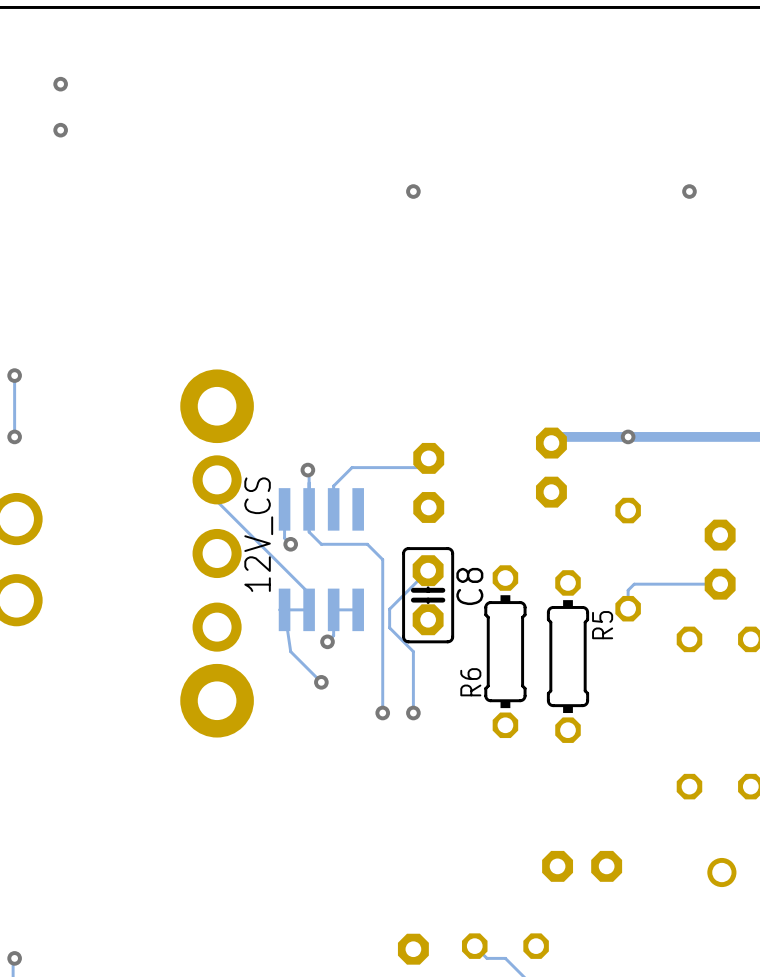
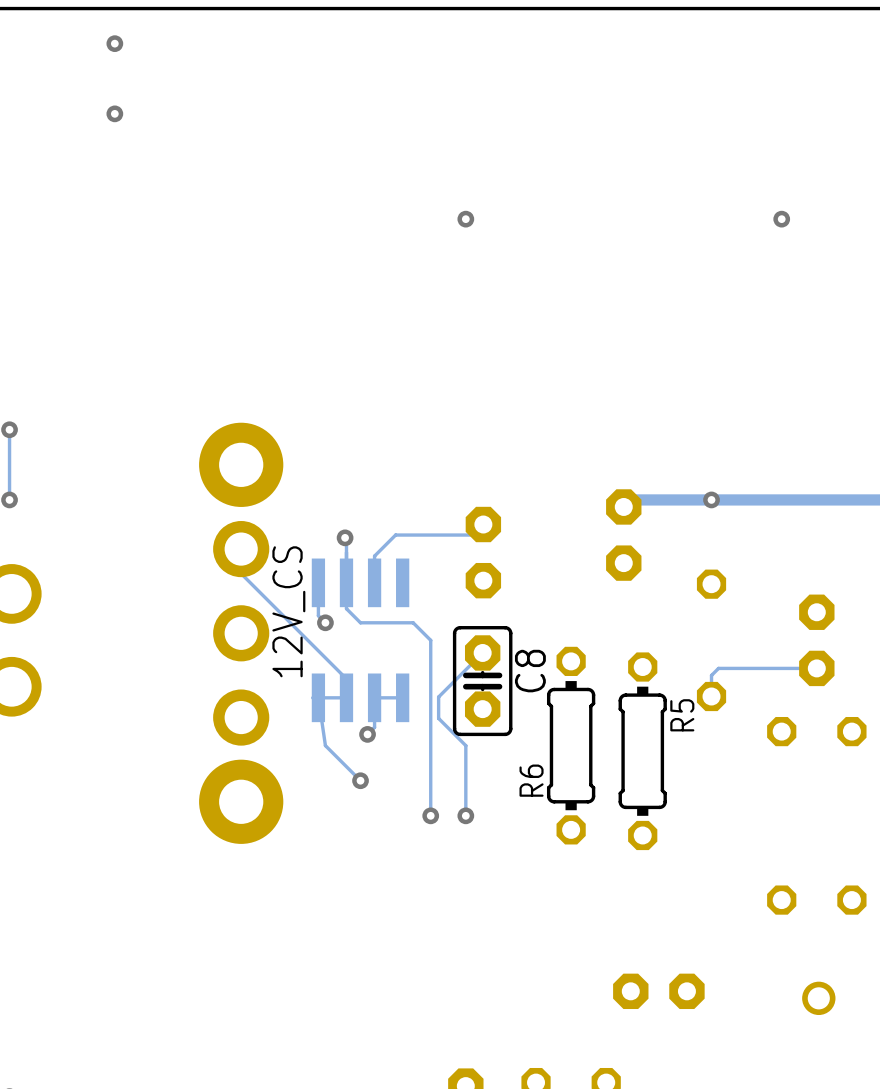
via: none -> (114, 43)
via: (60, 84) -> none
via: none -> (114, 113)
via: (60, 130) -> none

